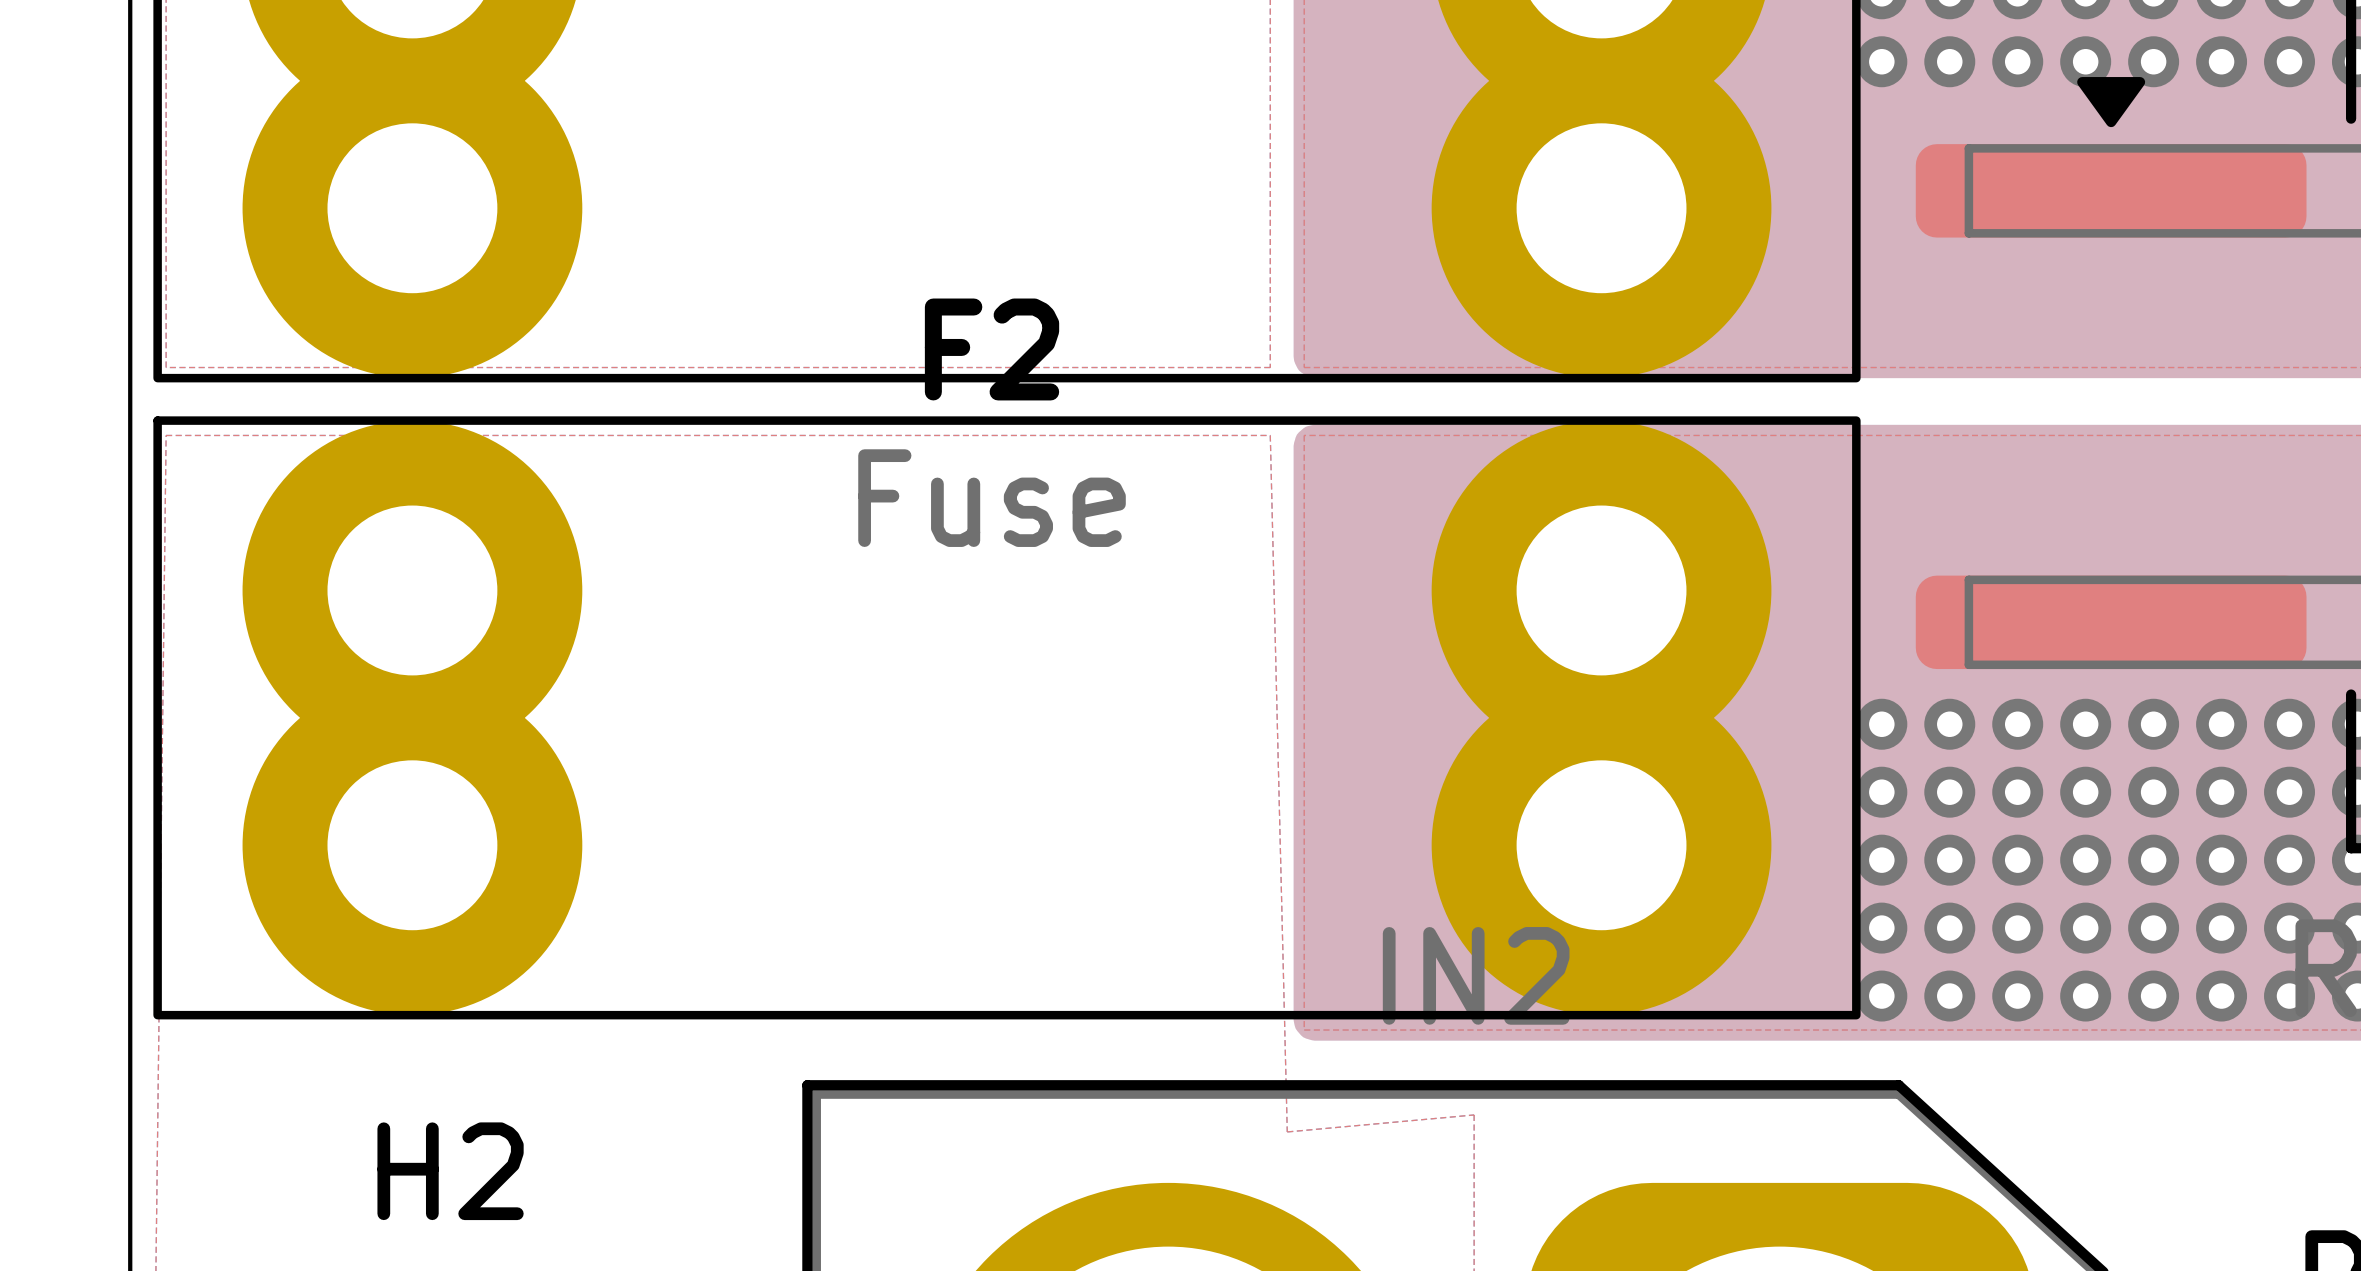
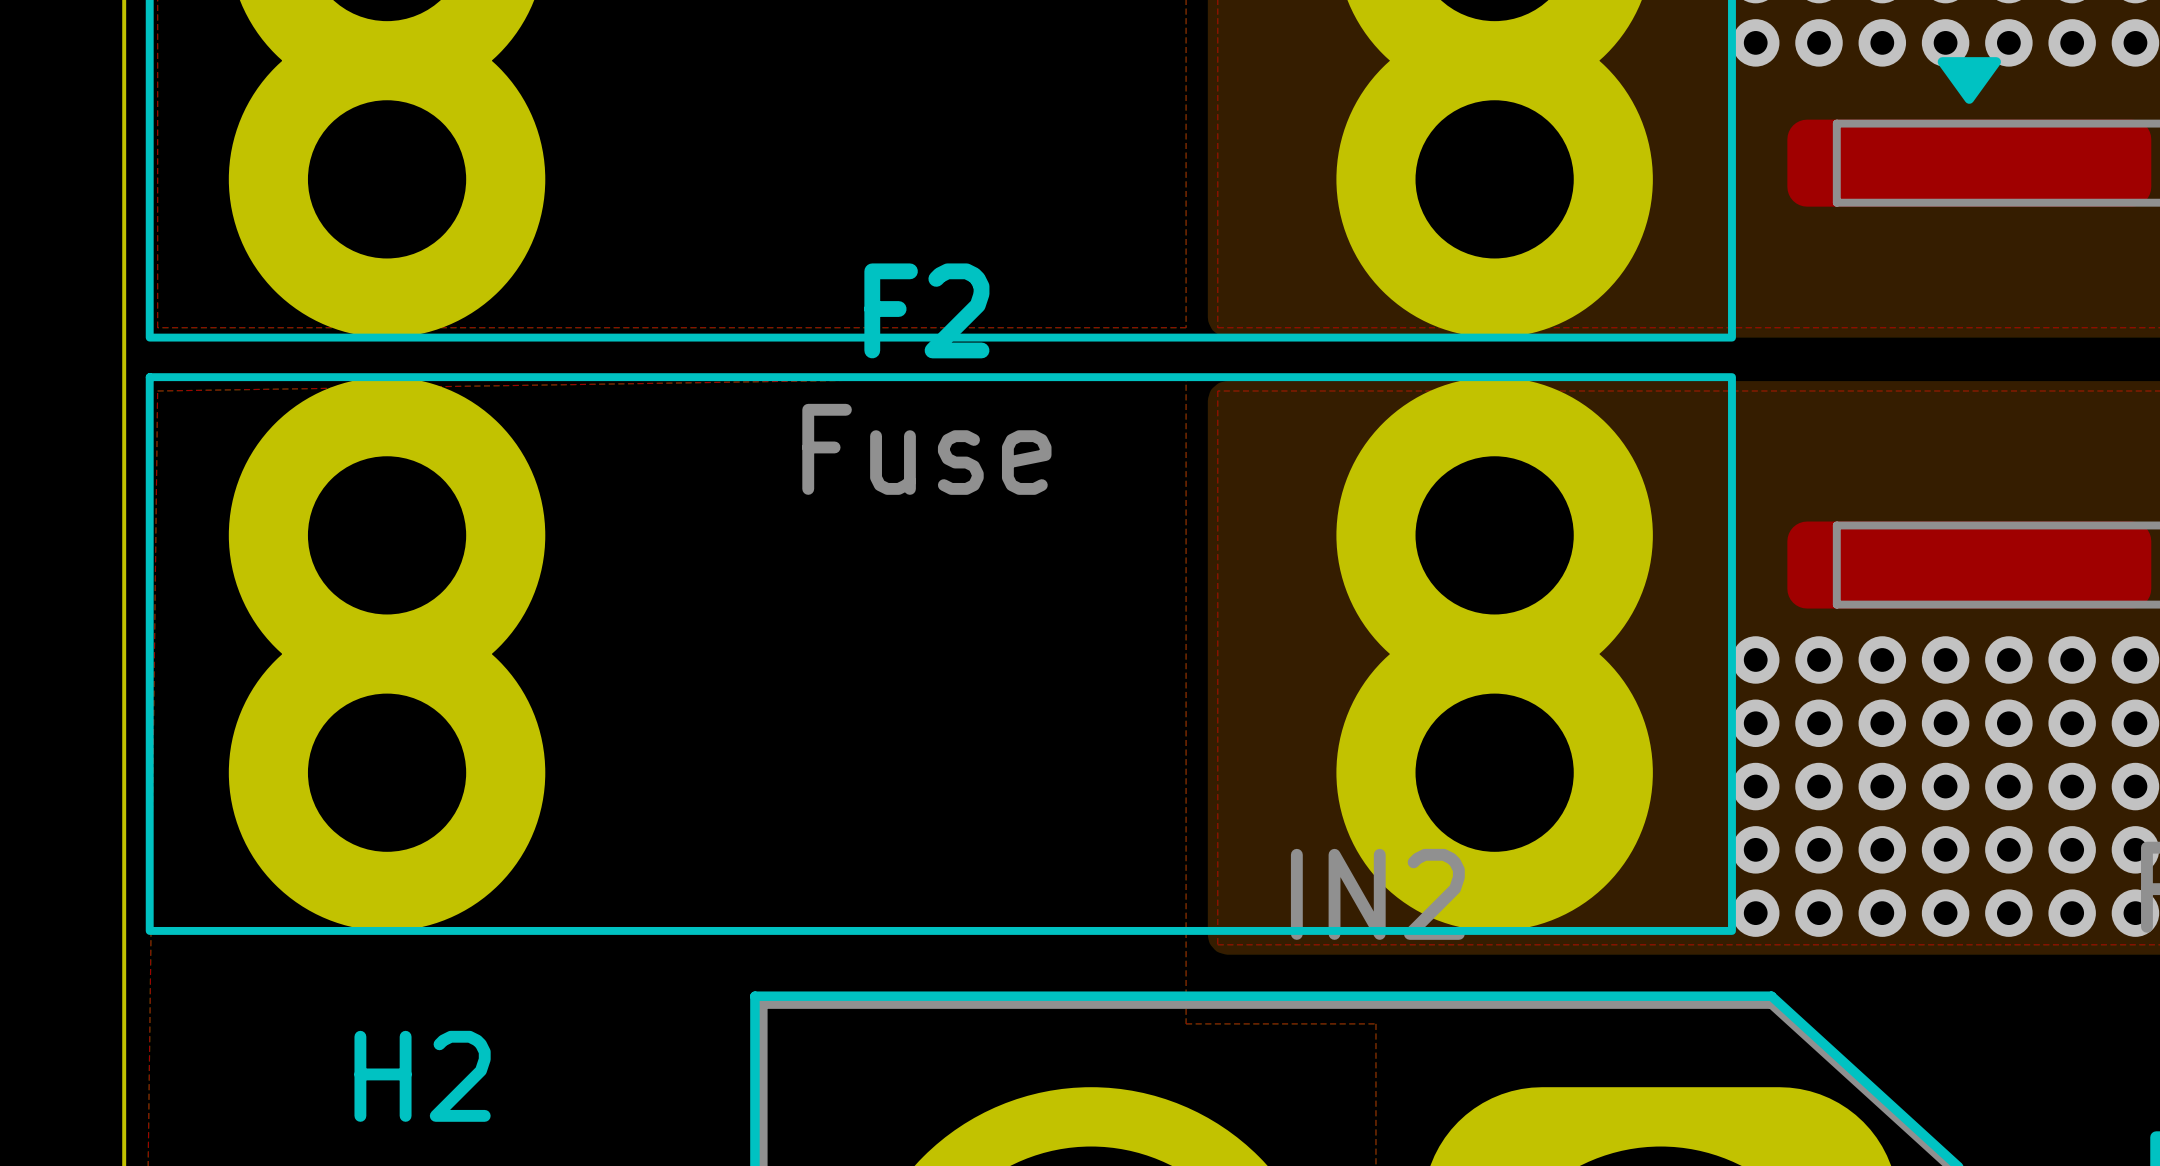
top zone outline: (166, 435) (1270, 435) (1287, 1131) (1474, 1114) -> (157, 390) (1186, 375) (1186, 1023) (1375, 1023)

